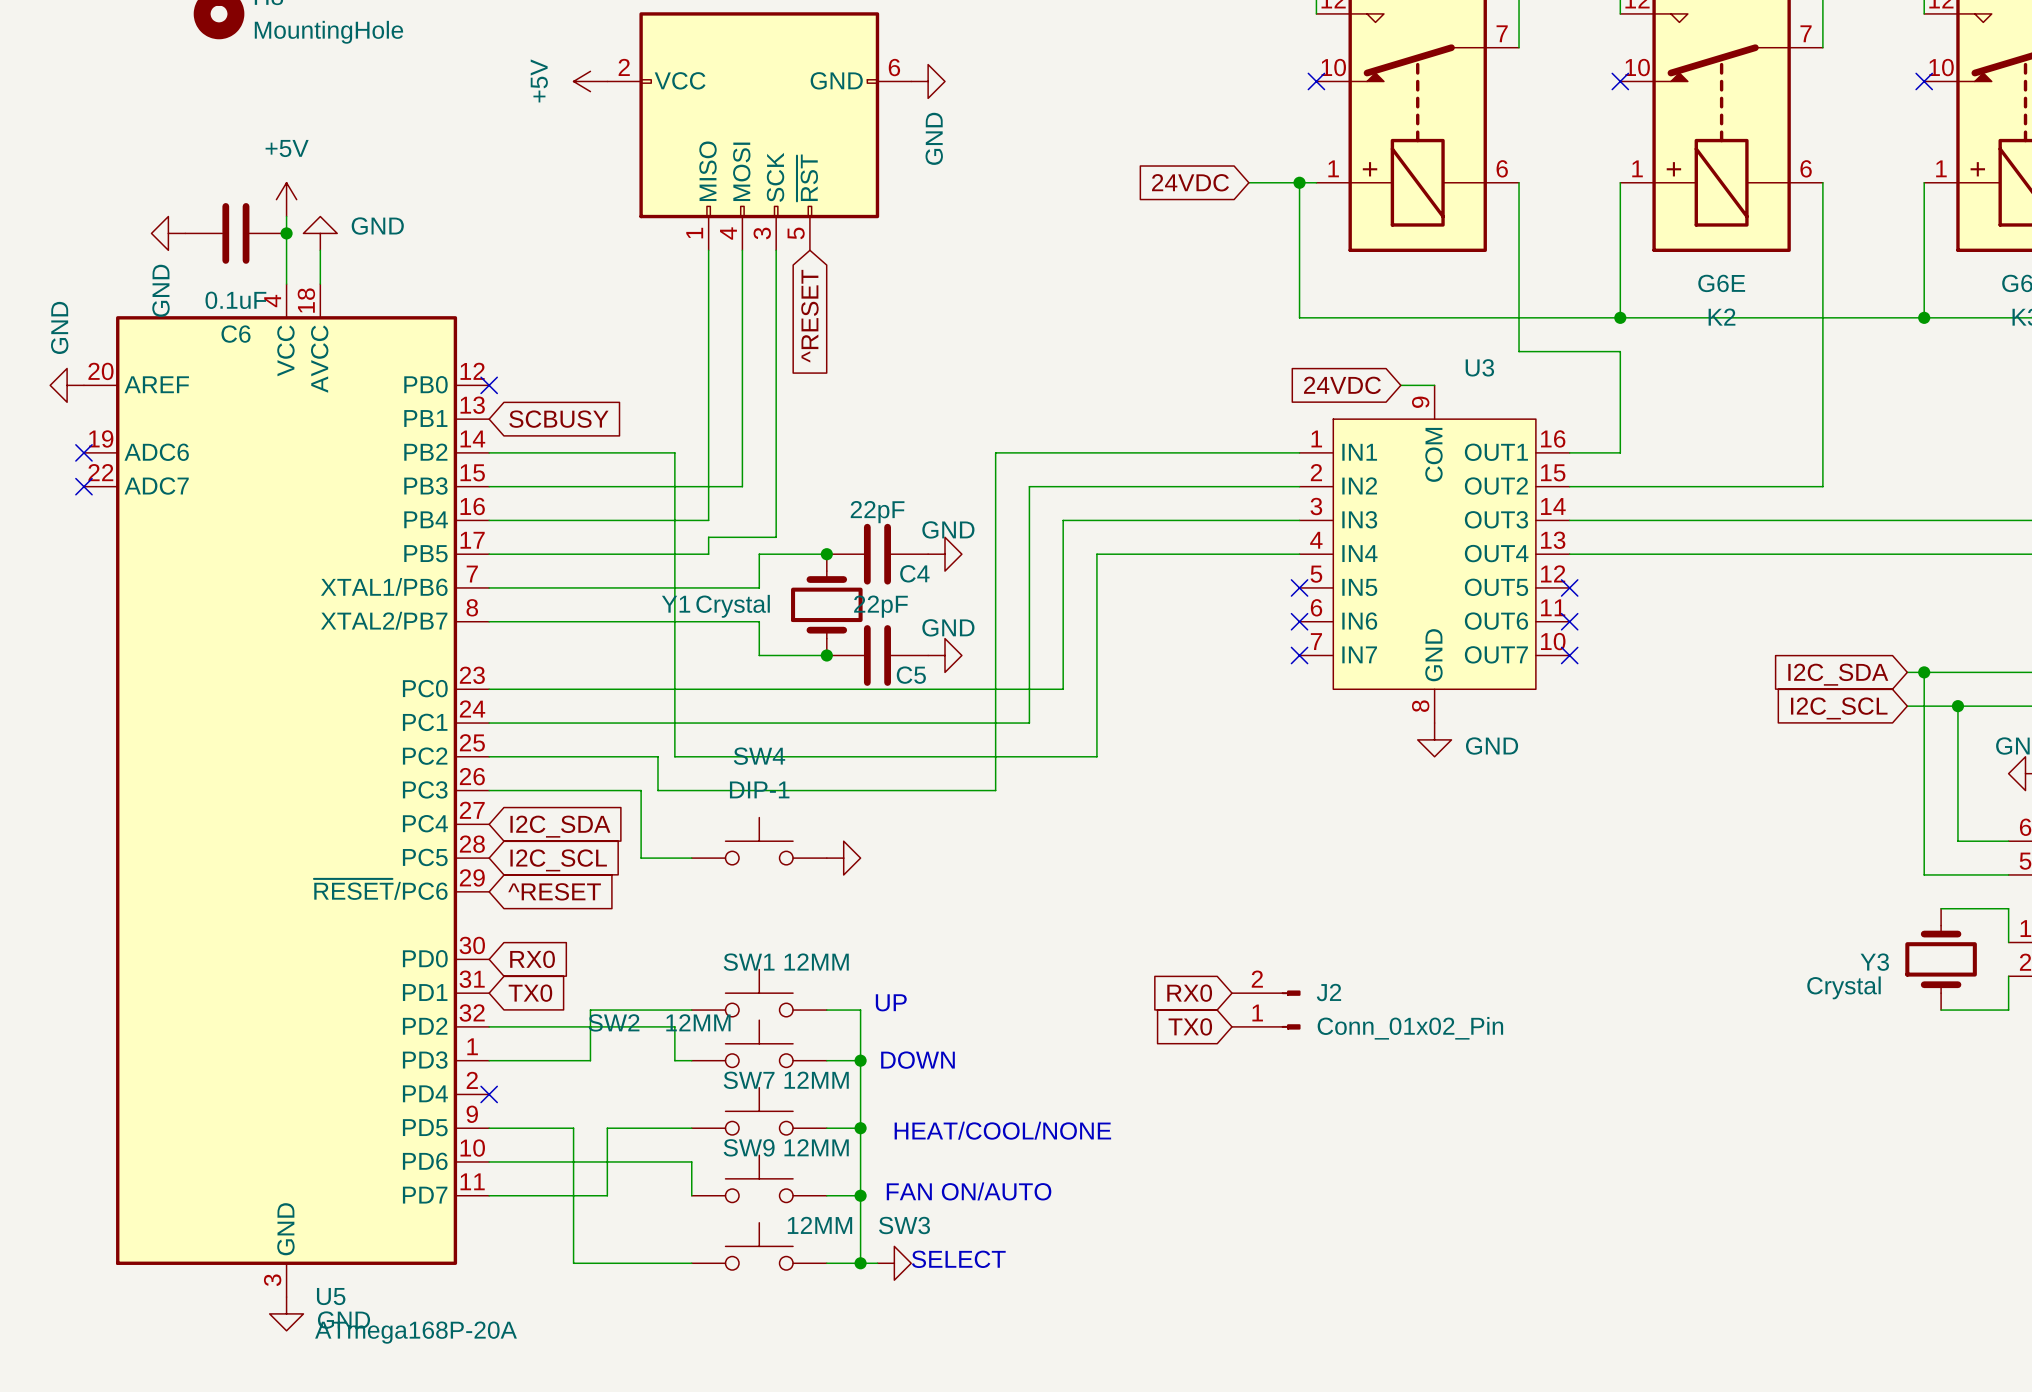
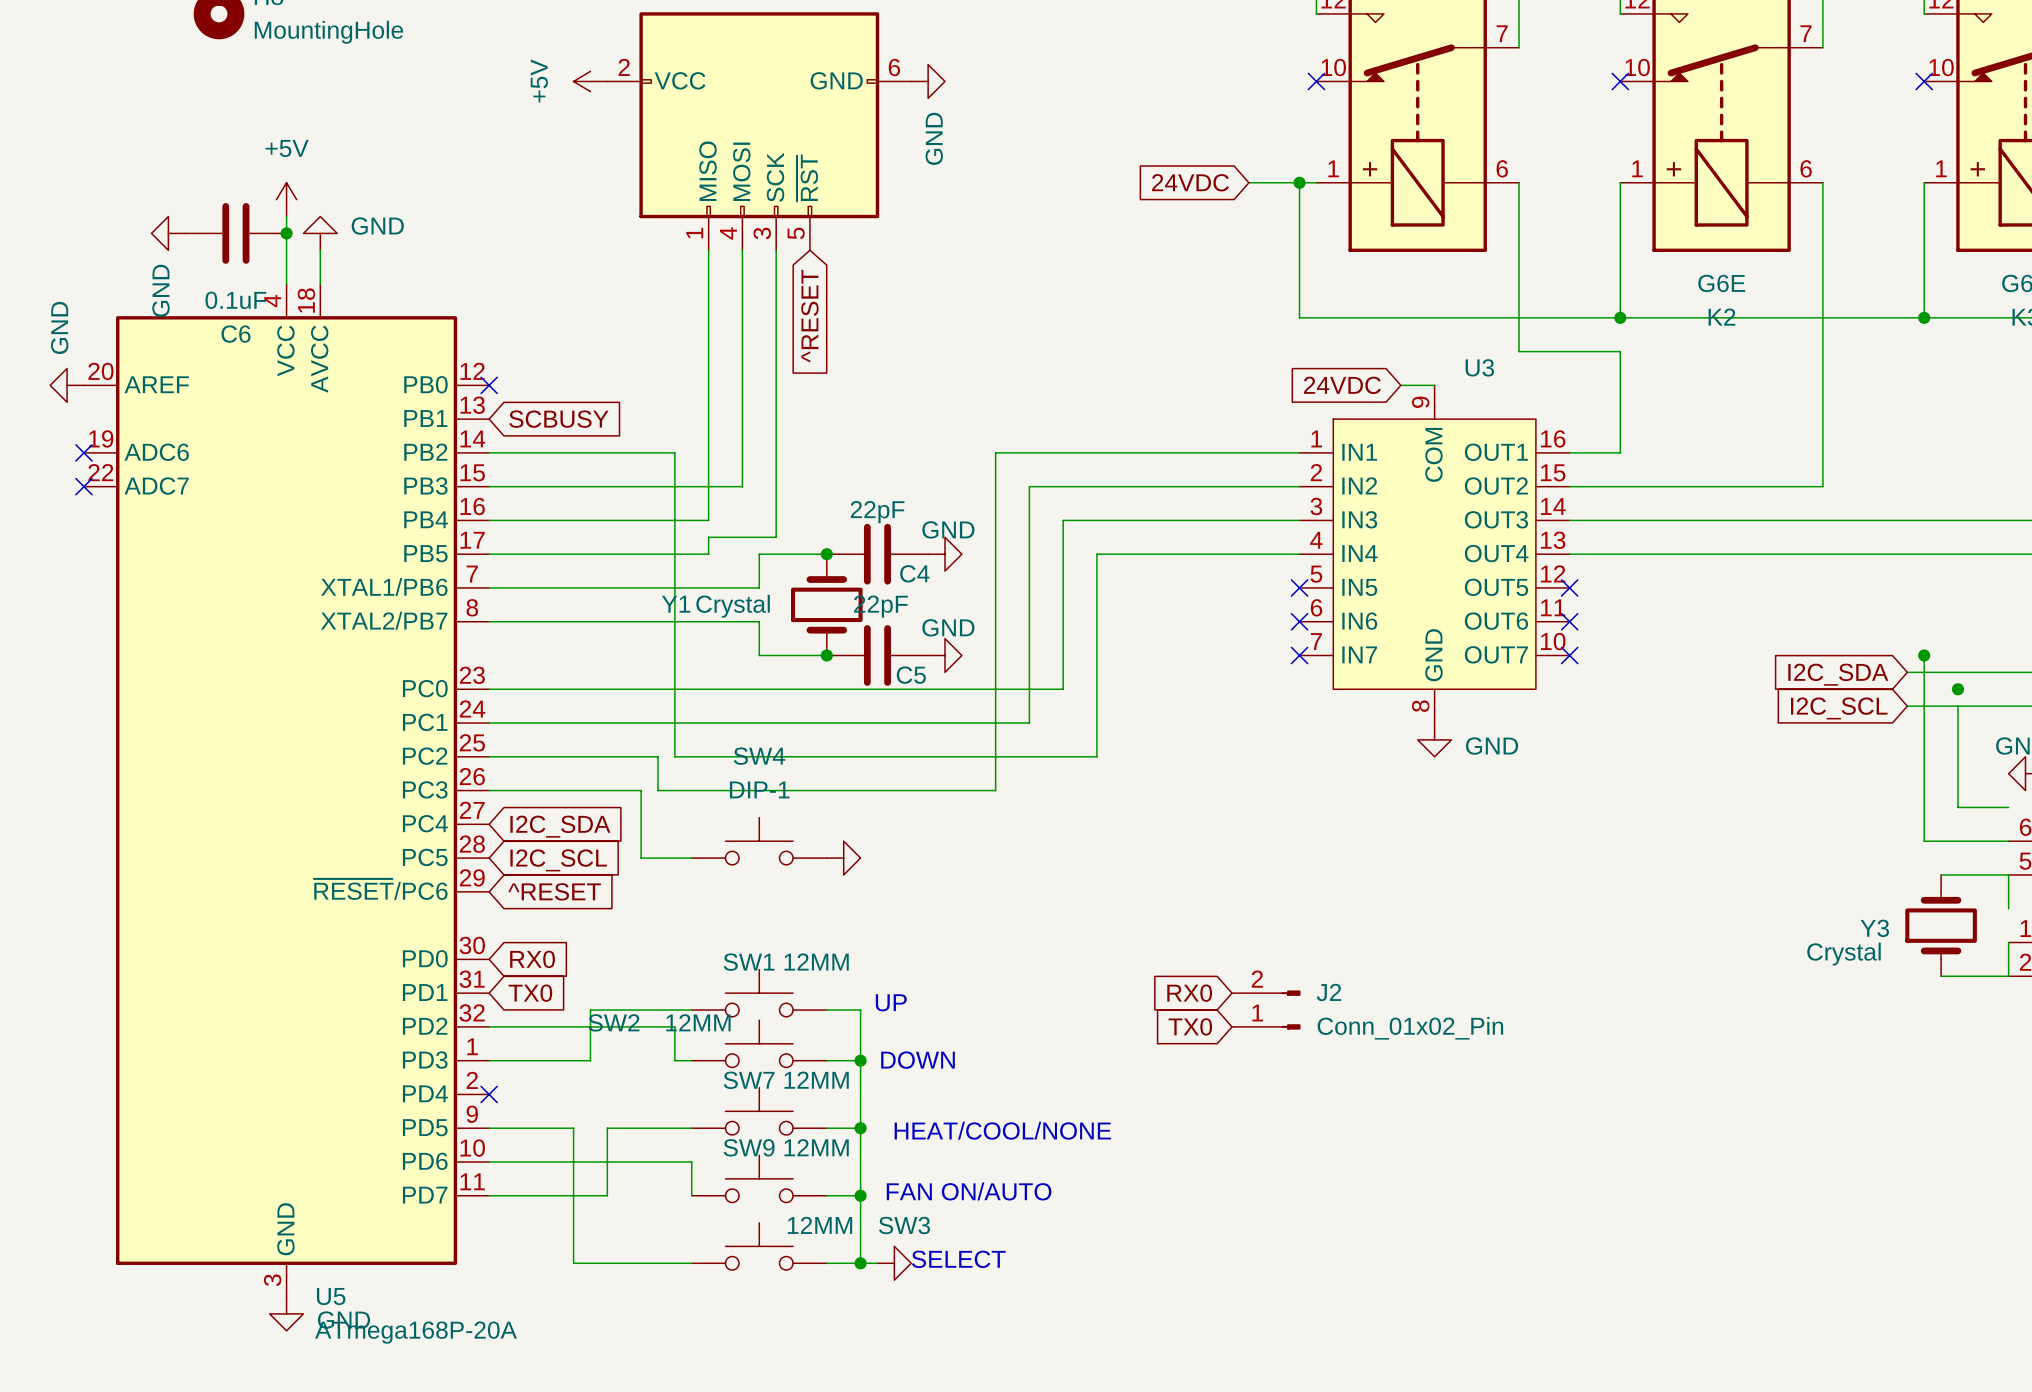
wire: none -> (1924, 655) (1924, 672)
junction position: (1924, 672) -> (1924, 655)
junction position: (1957, 706) -> (1957, 689)
wire: (1957, 807) (1957, 841) -> (1957, 807) (2008, 807)
wire: (1924, 841) (1924, 874) (1941, 874) -> (1924, 841) (1957, 841)
wire: none -> (2008, 874) (2008, 908)
wire: (1941, 908) (2008, 908) (2008, 942) -> (1941, 976) (2008, 976) (2008, 942)
Y3 position: (1941, 959) -> (1941, 925)
wire: (2008, 976) (2008, 1010) (1941, 1010) -> none

